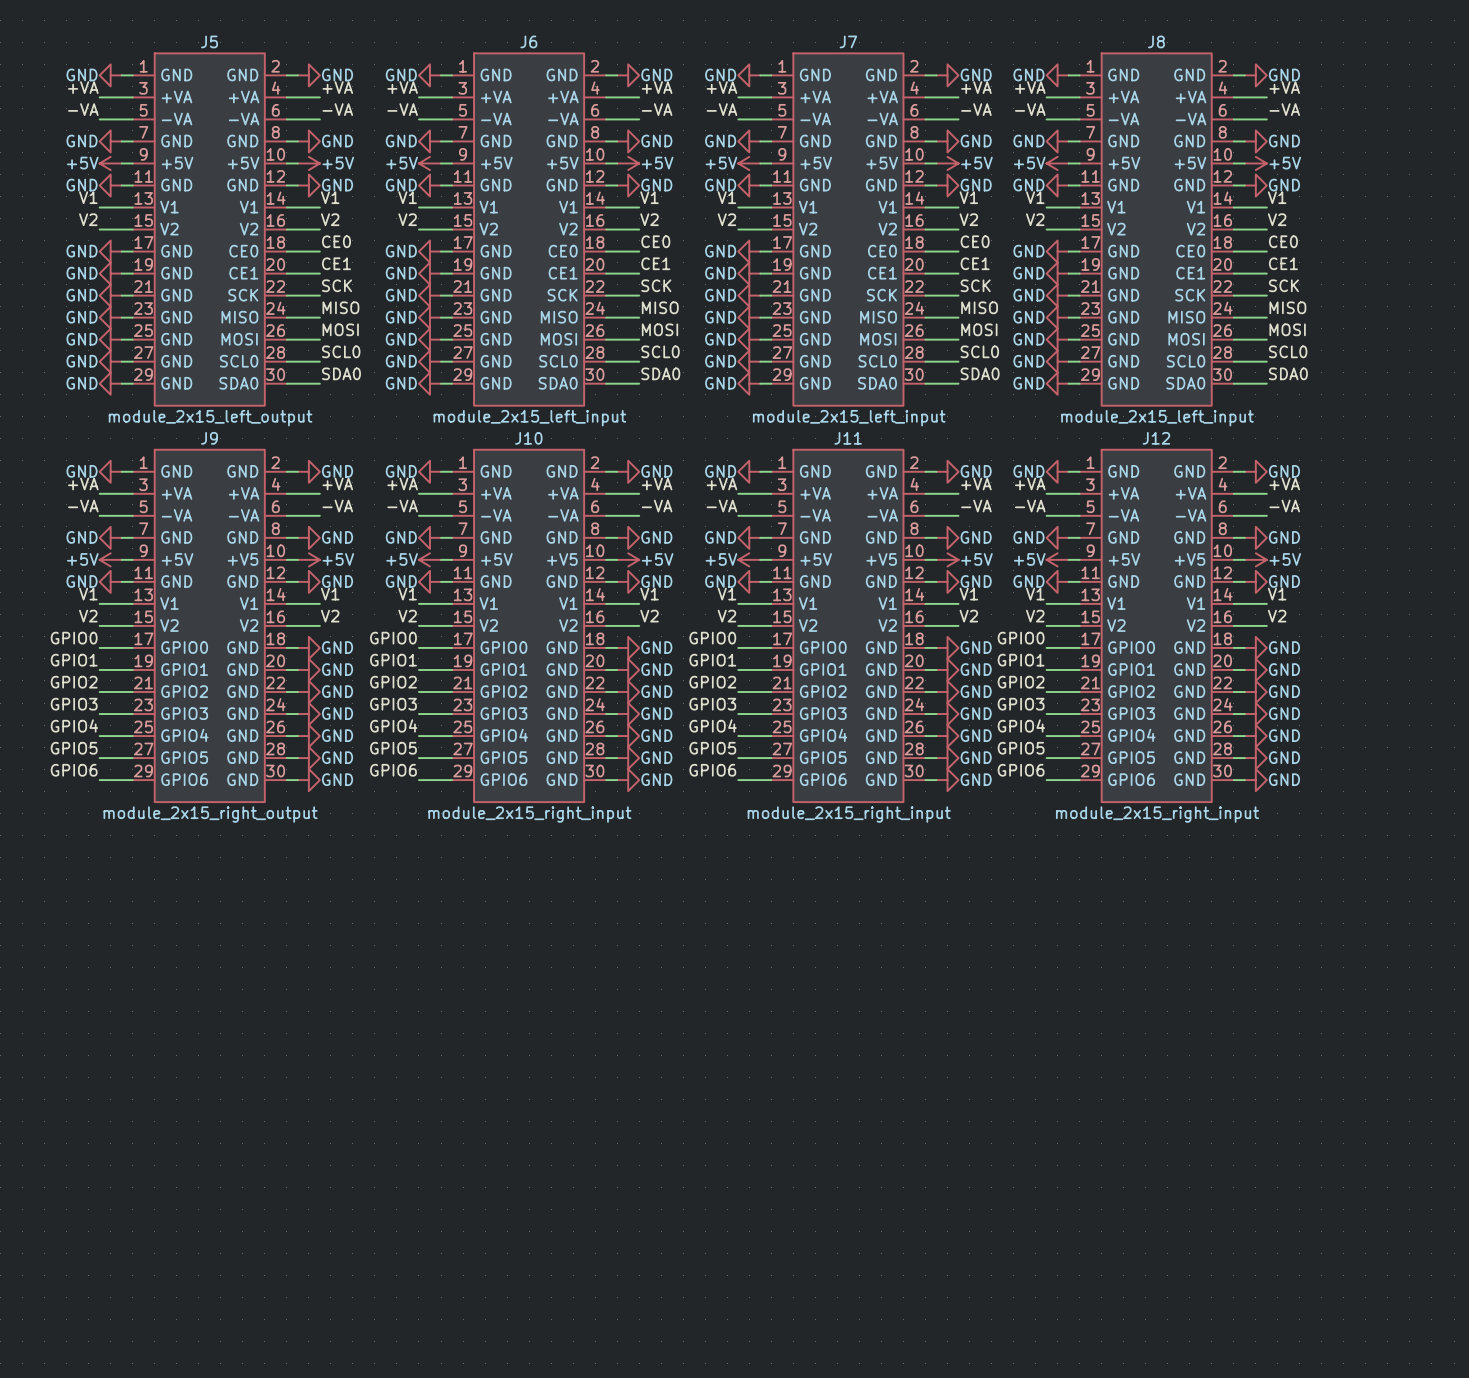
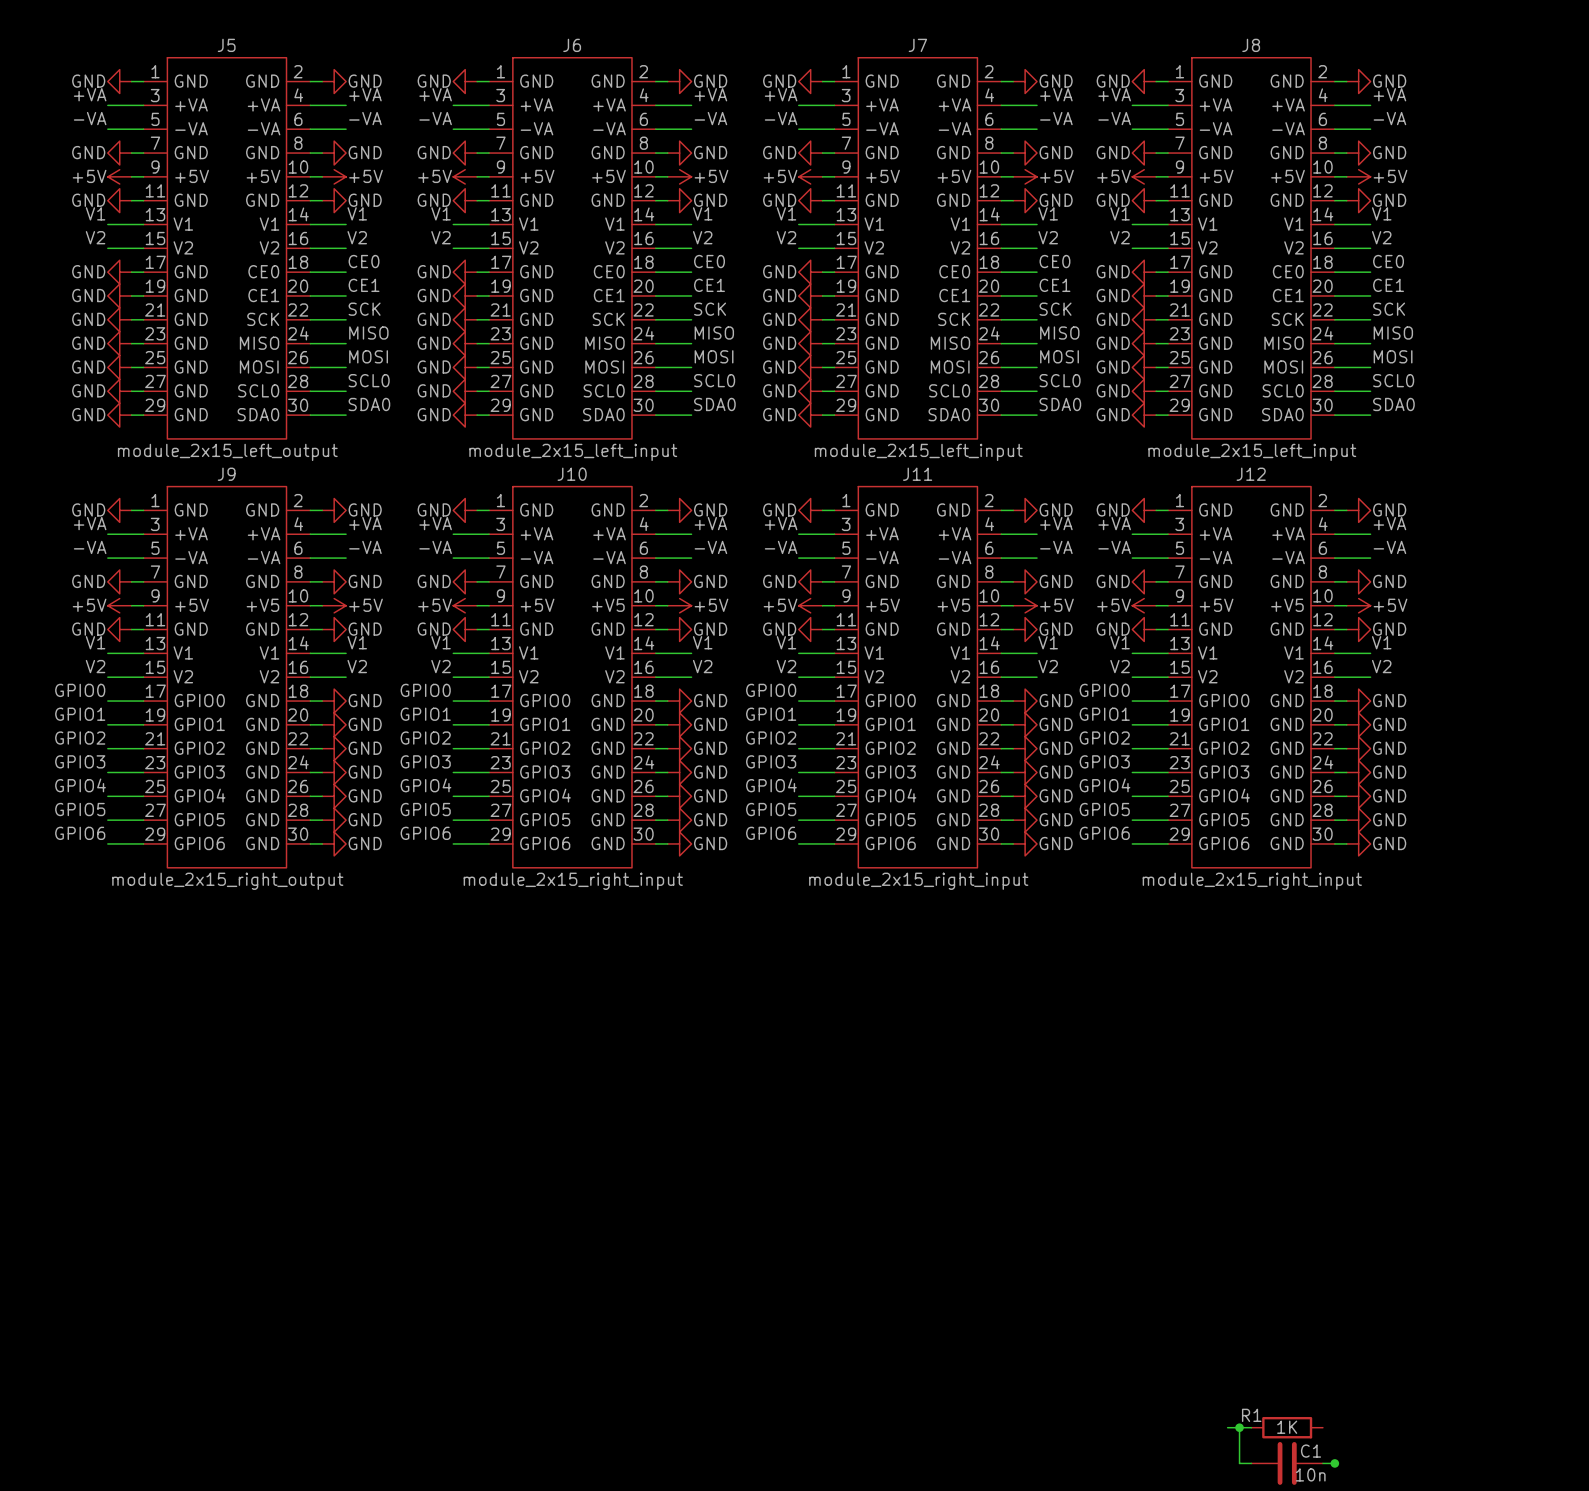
wire: none -> (1227, 1427) (1251, 1427)
wire: none -> (1239, 1427) (1239, 1463) (1251, 1463)
junction: none -> (1239, 1427)
R1: none -> 1K (1287, 1427)
C1: none -> 10n (1287, 1463)
wire: none -> (1322, 1463) (1334, 1463)
junction: none -> (1334, 1463)

